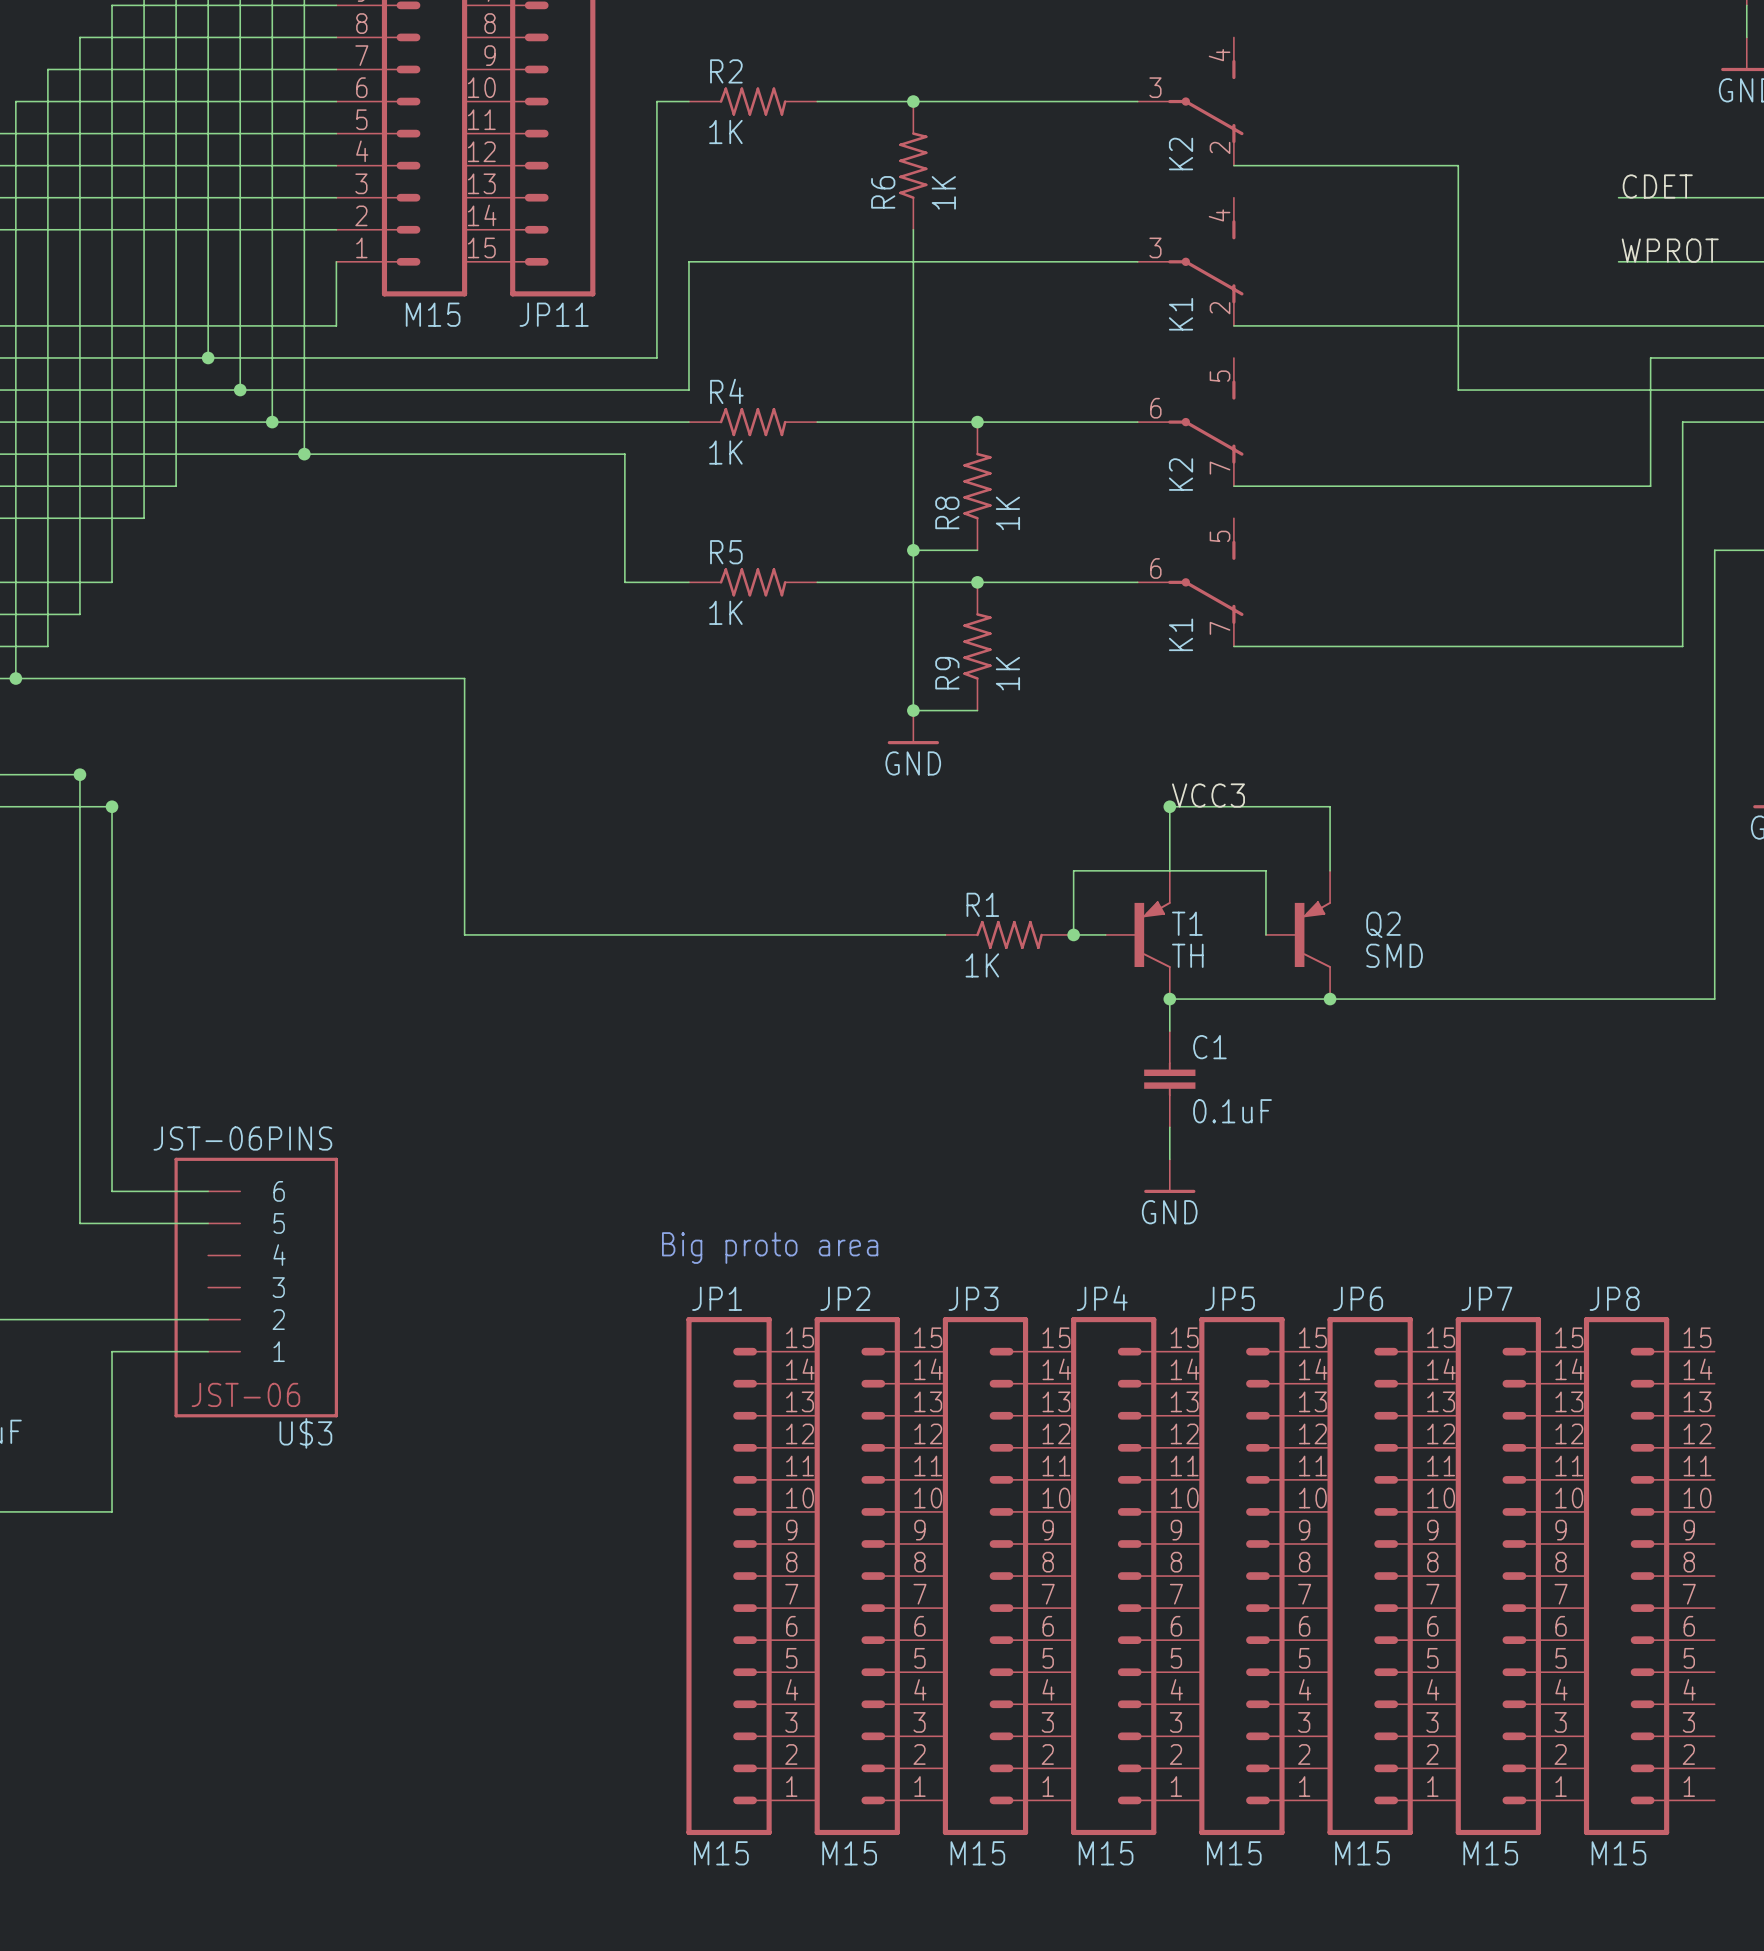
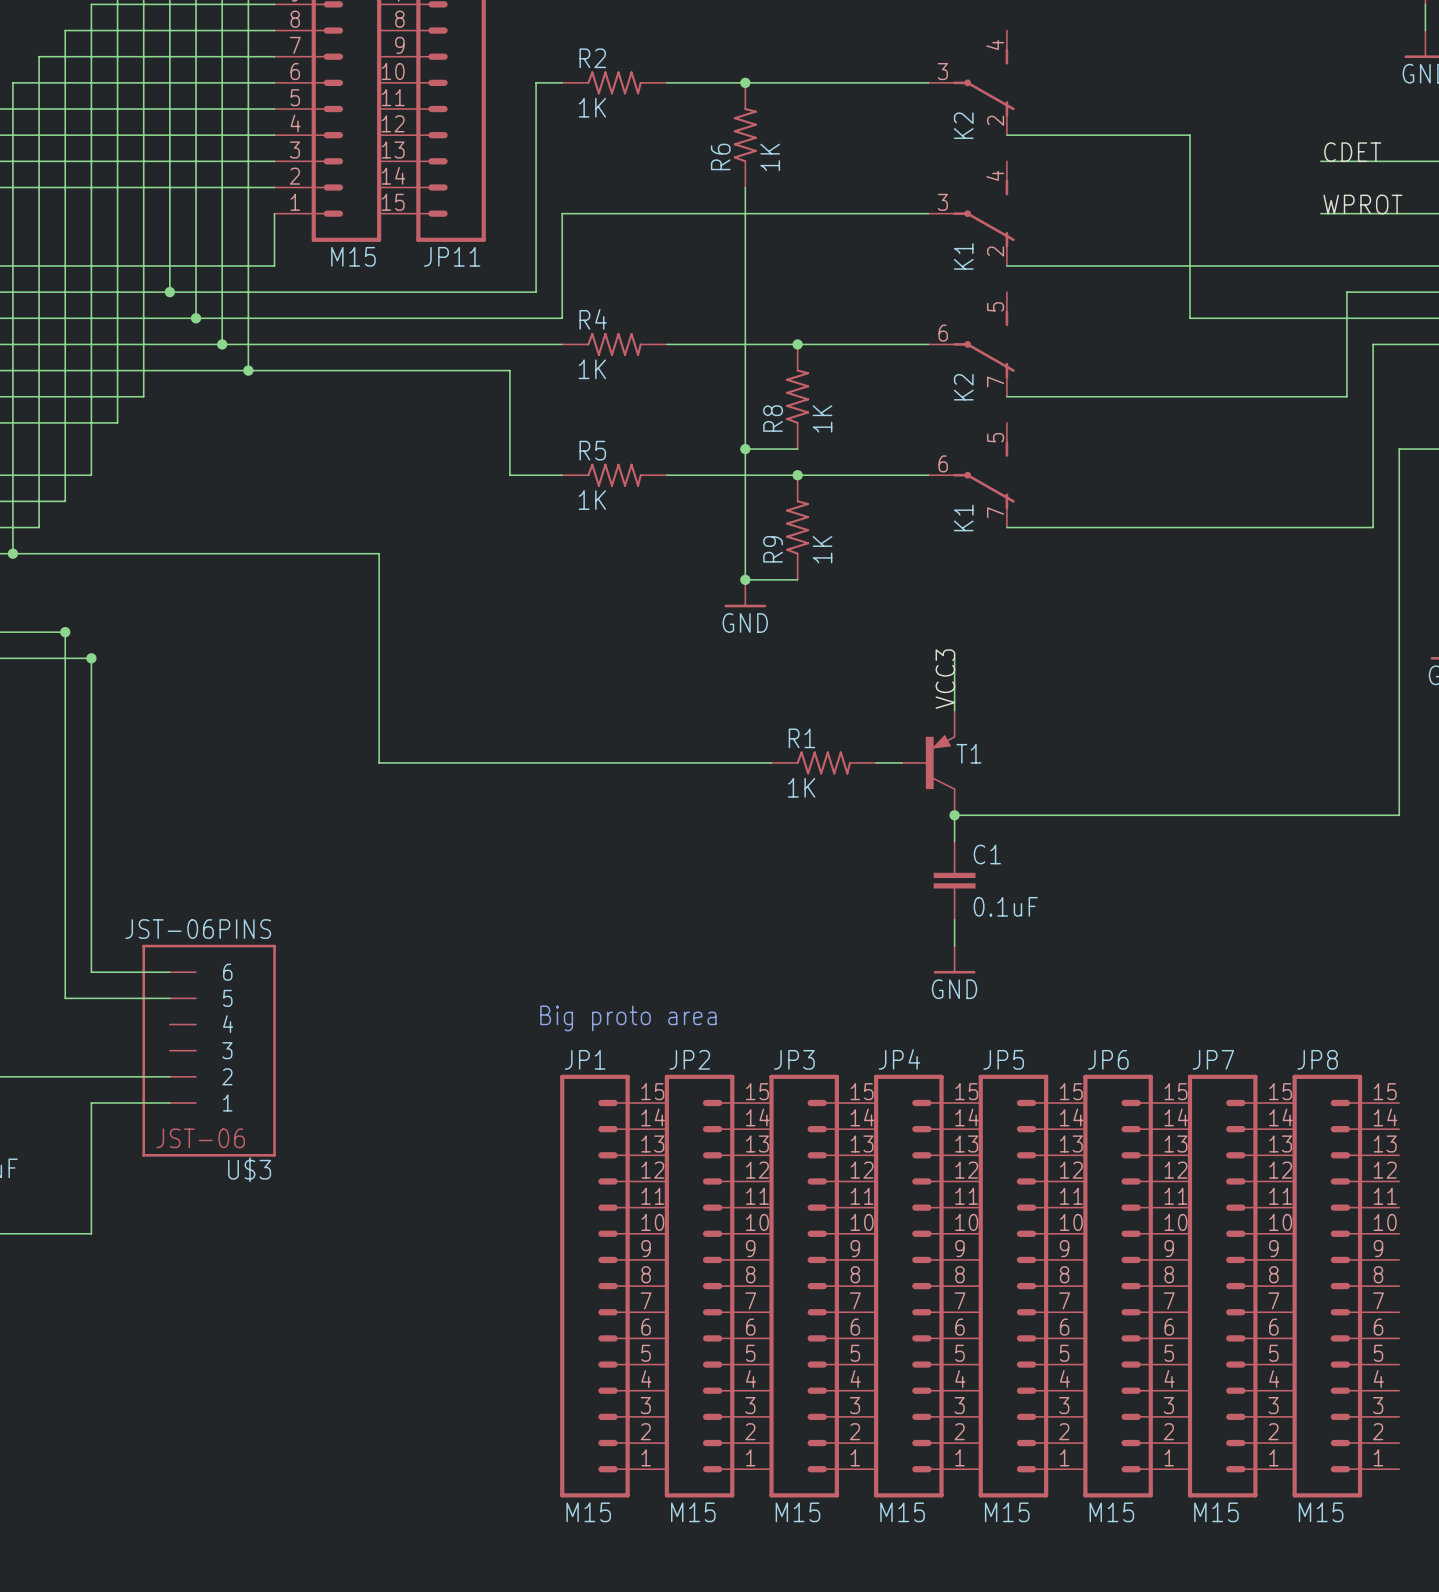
label rotation: 0° (1208, 795) -> 90° counterclockwise (945, 679)
wire: (1169, 806) (1330, 806) (1330, 870) -> none
junction: (1169, 806) -> none
wire: (1073, 934) (1073, 870) (1265, 870) (1265, 934) -> none
junction: (1073, 934) -> none
Q2: SMD (1298, 934) -> none
T1 value: TH (1187, 955) -> none
junction: (1330, 999) -> none

